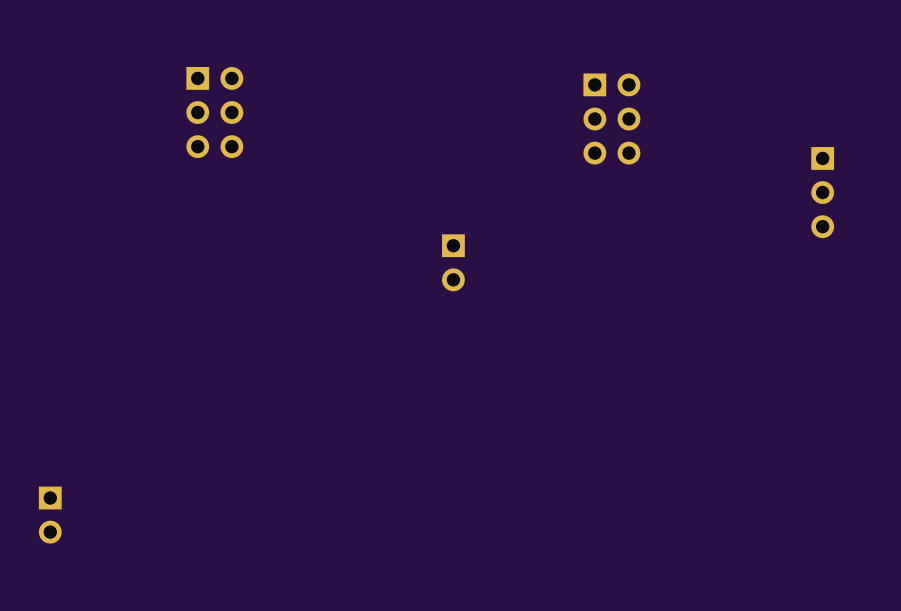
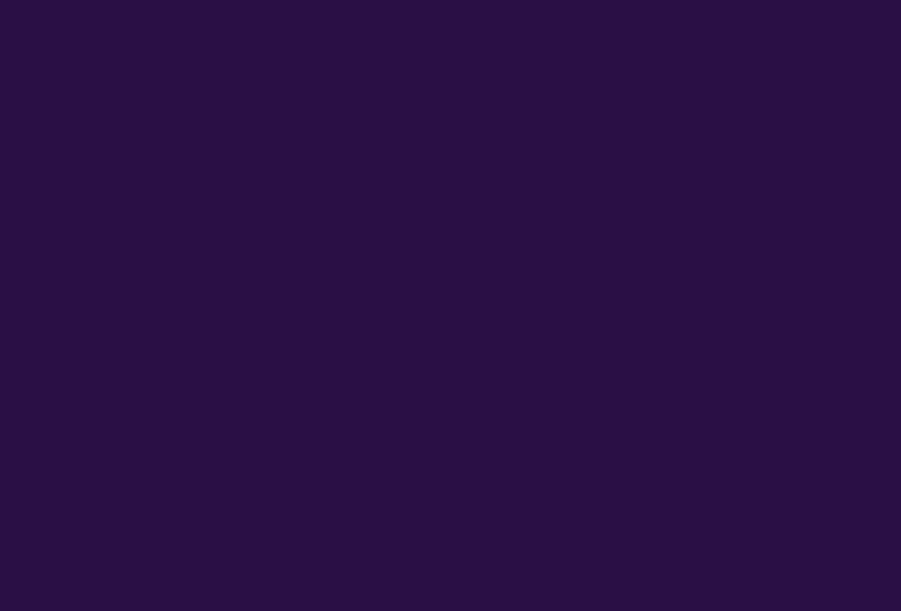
part: (214, 112) -> none
part: (611, 118) -> none
part: (822, 192) -> none
part: (453, 262) -> none
part: (50, 515) -> none

